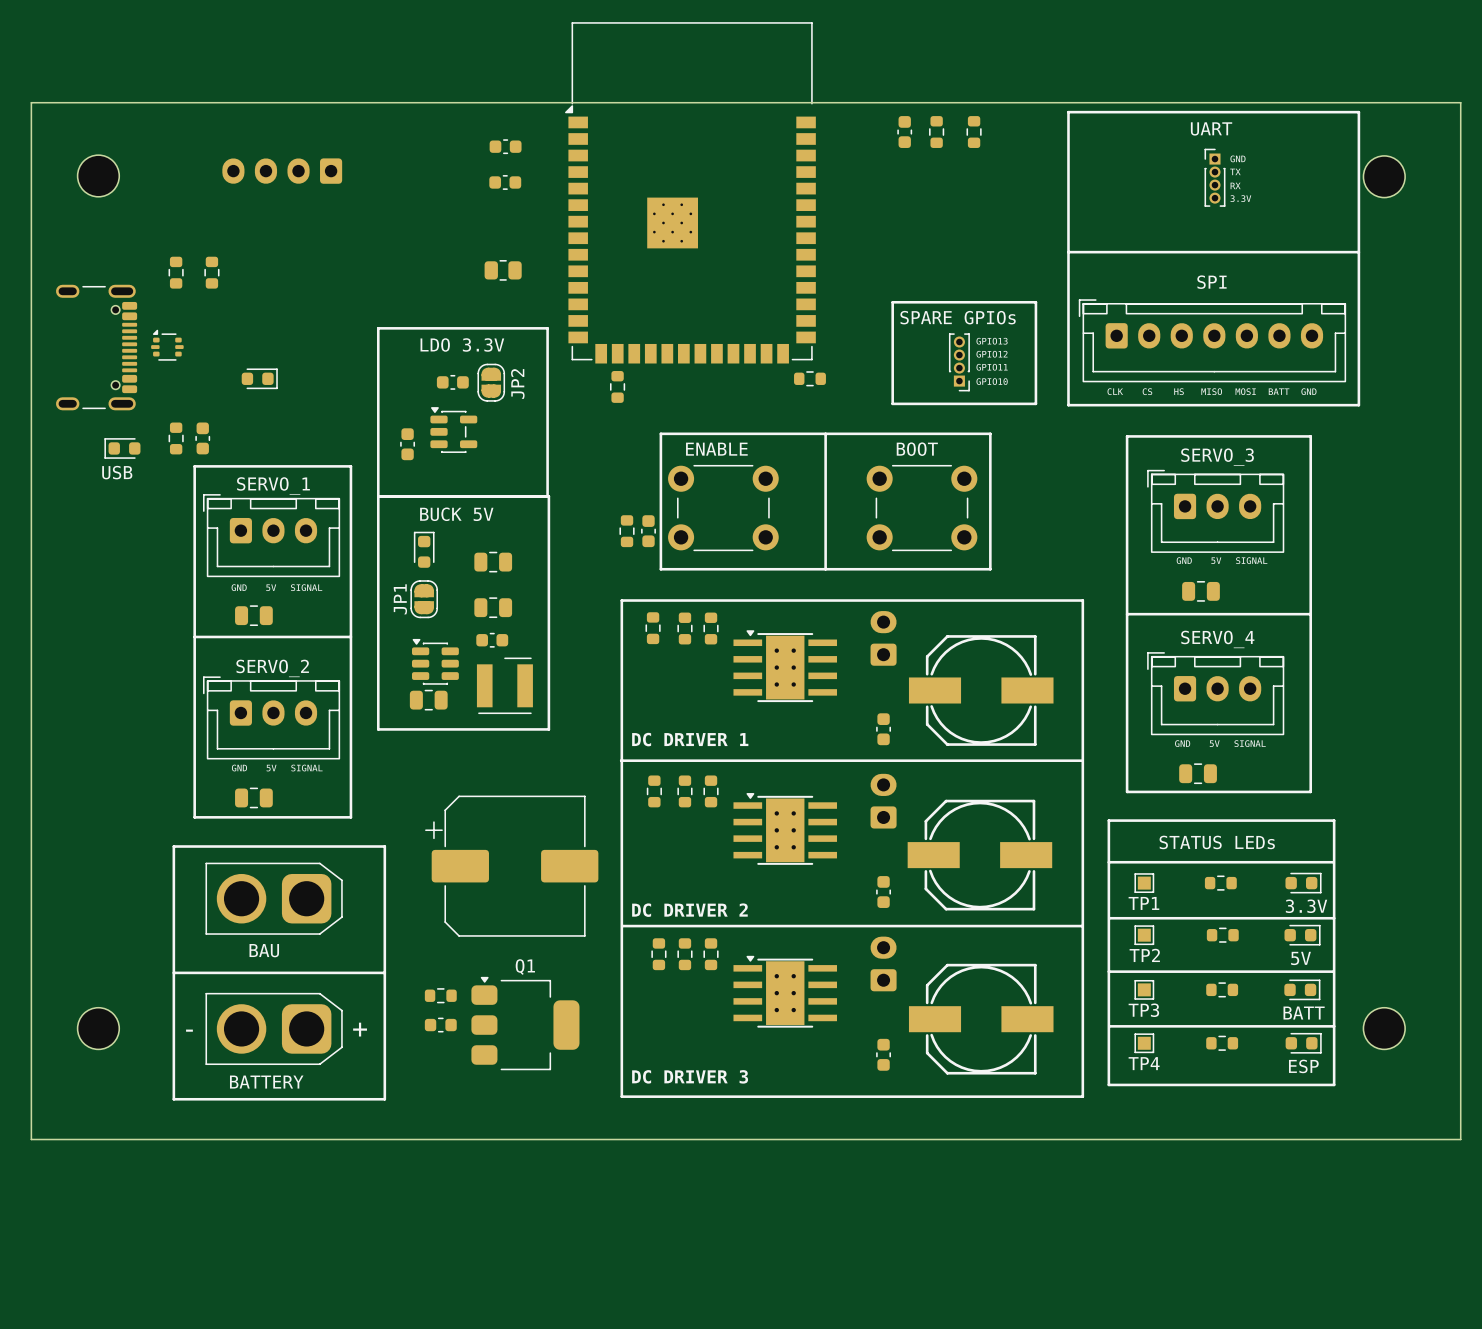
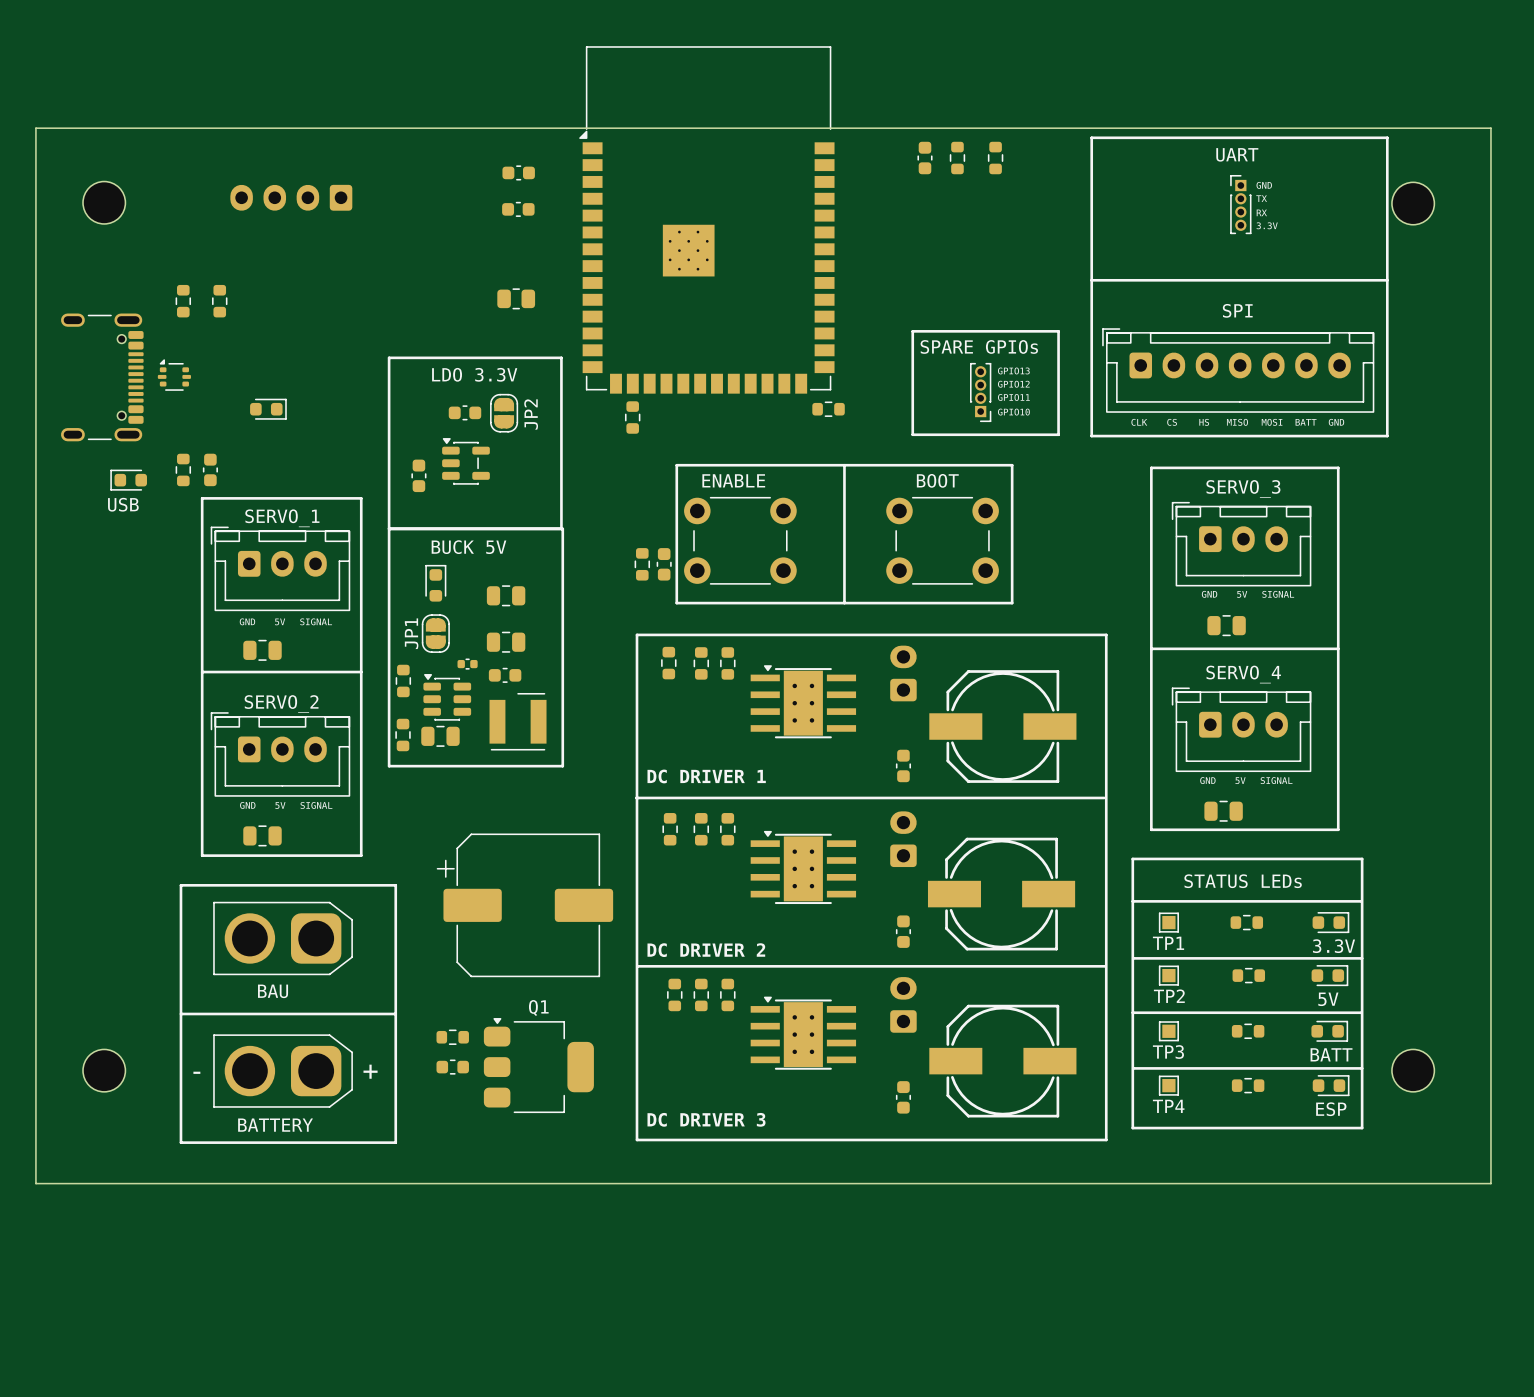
part: none -> (467, 664)
part: none -> (403, 680)
part: none -> (403, 735)

